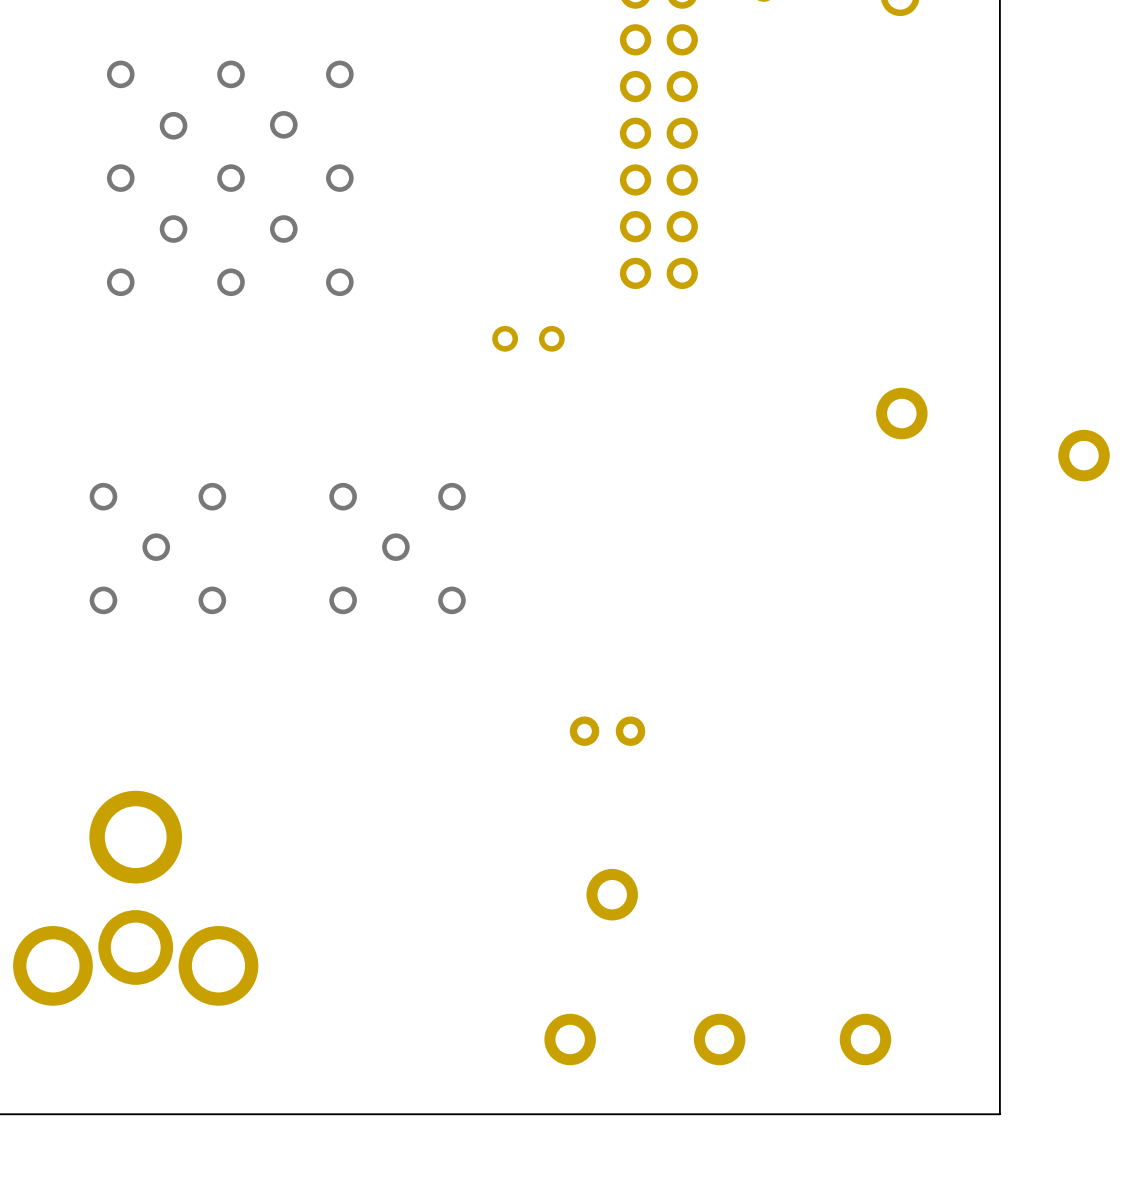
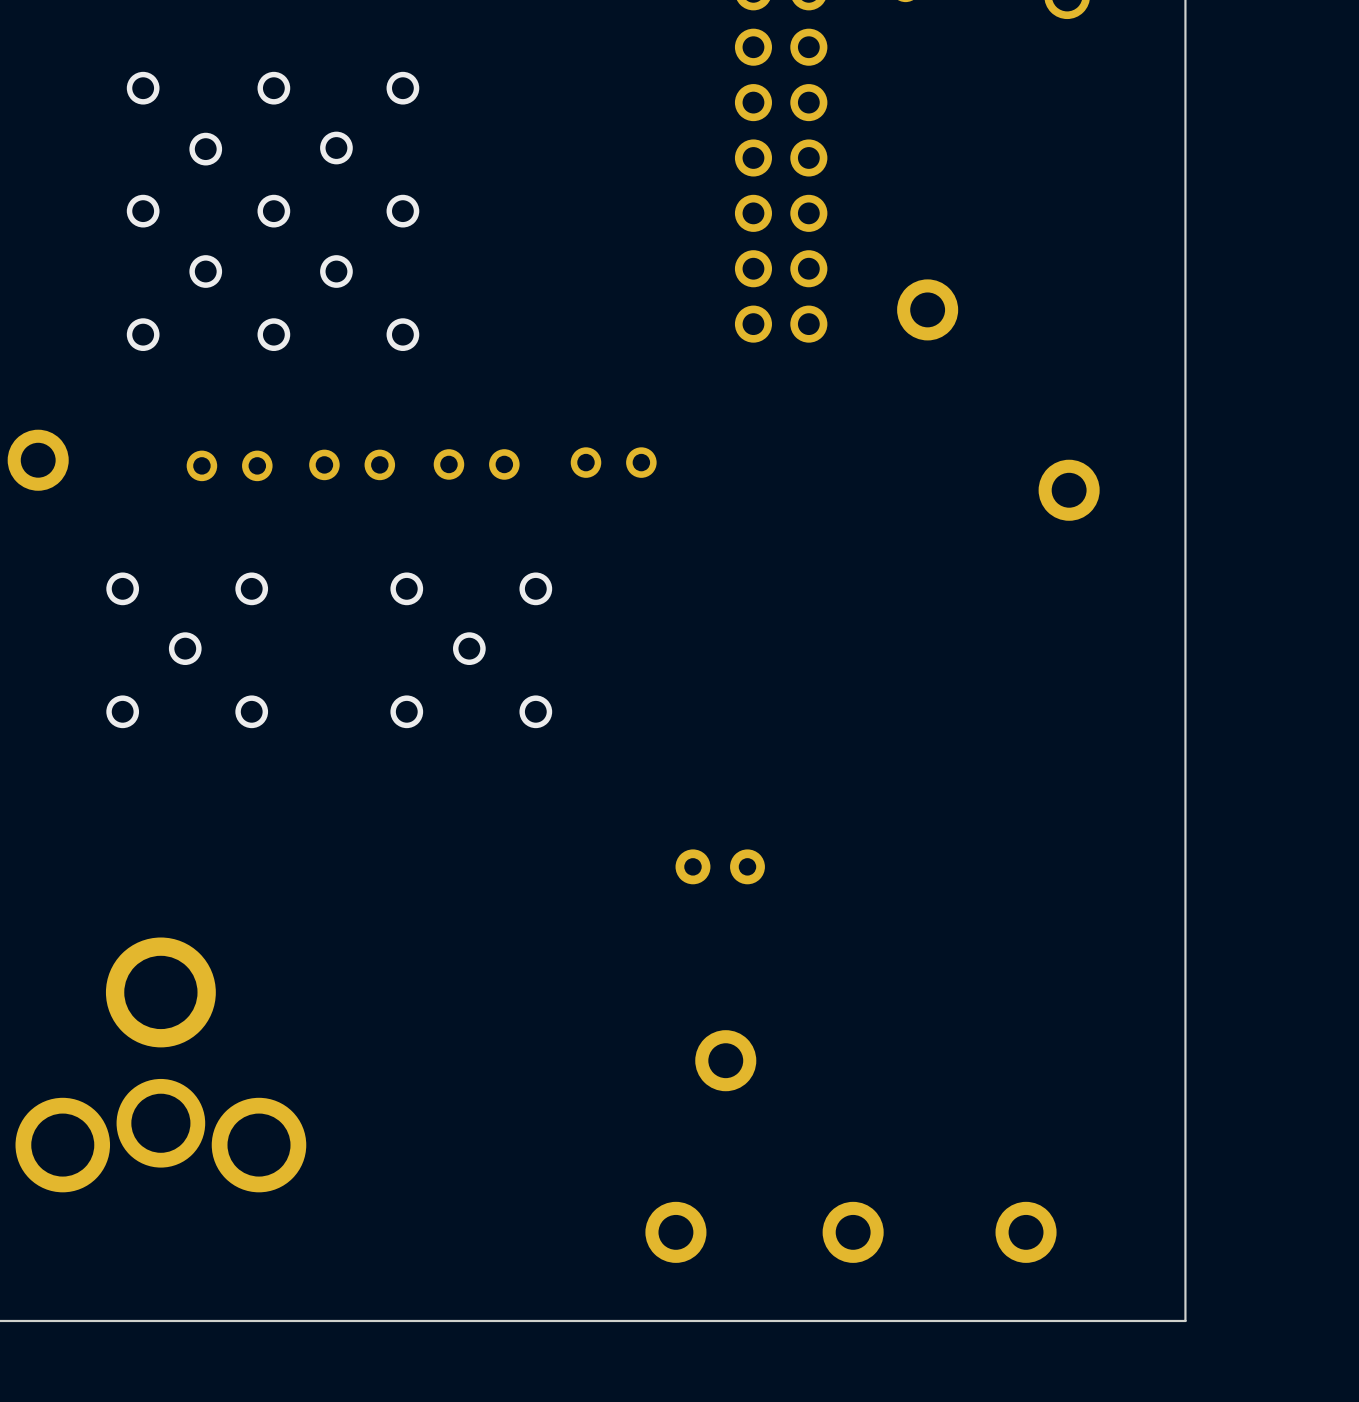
part position: (528, 338) -> (613, 462)
part: none -> (38, 460)
part: none -> (476, 464)
part: none -> (229, 465)
part: none -> (352, 464)
part position: (1084, 455) -> (927, 309)

